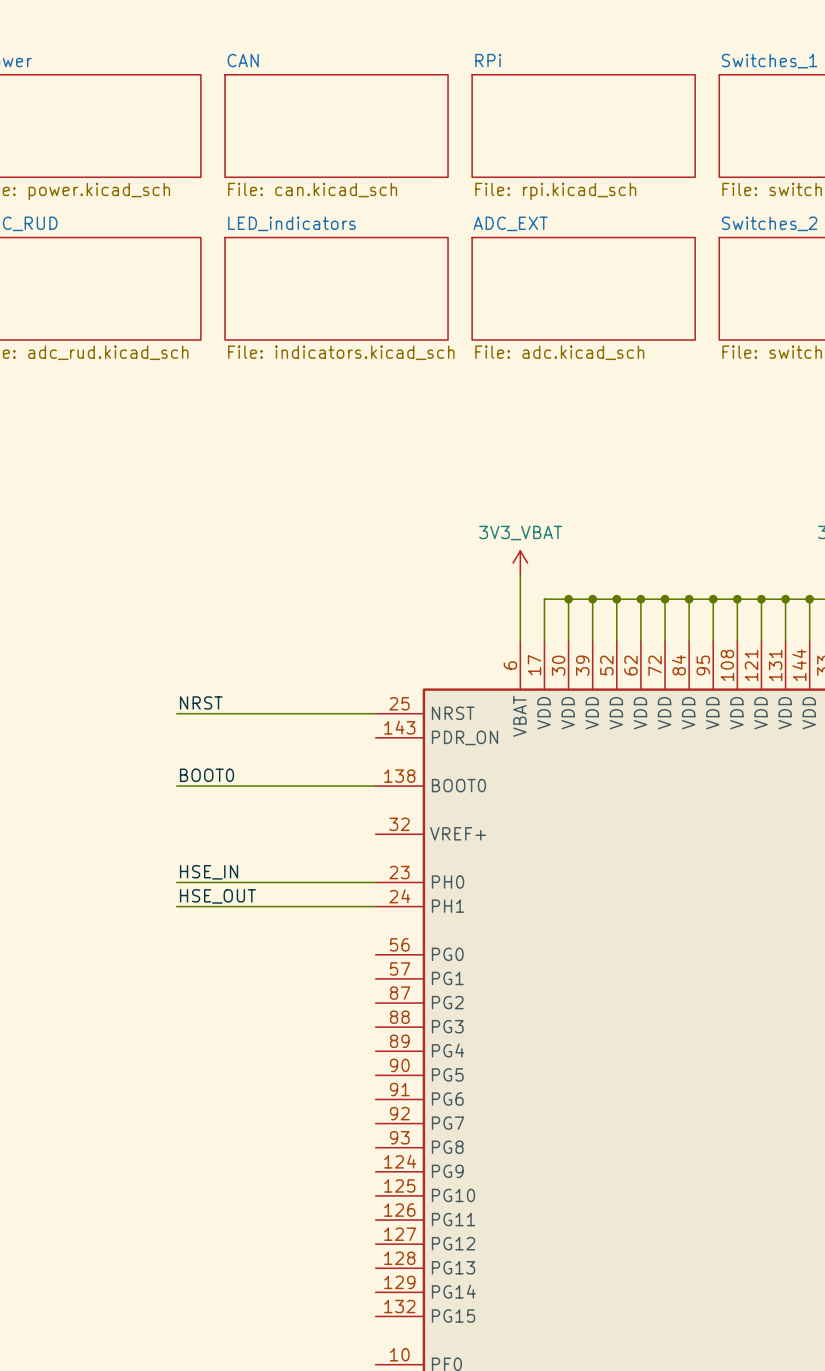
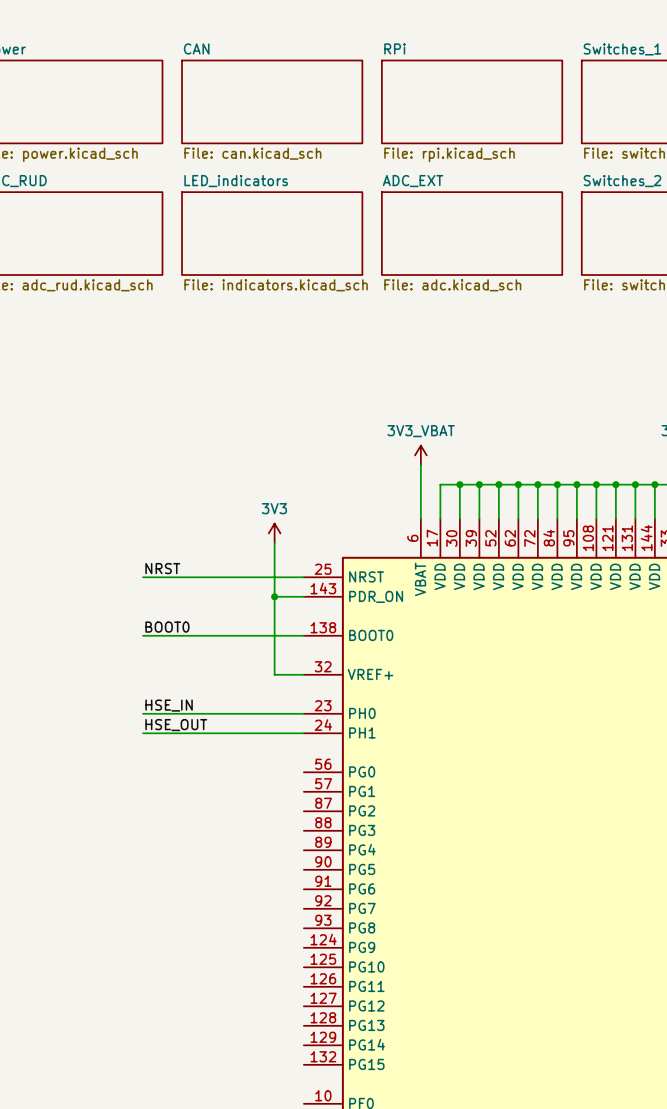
power symbol: none -> 3V3 (274, 533)
wire: none -> (274, 543) (274, 674) (303, 674)
wire: none -> (274, 596) (303, 596)
junction: none -> (274, 596)

